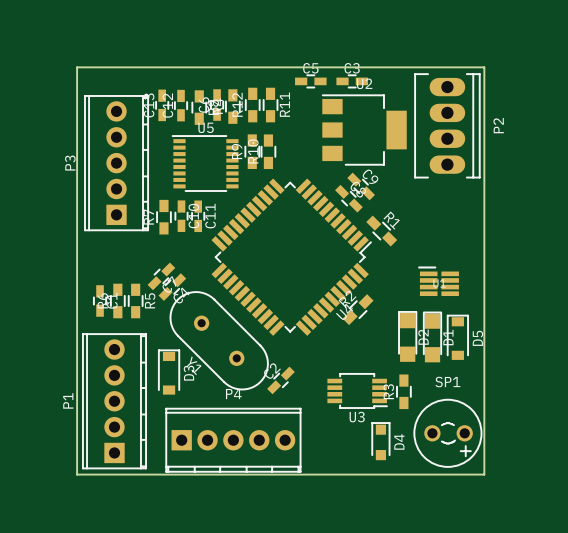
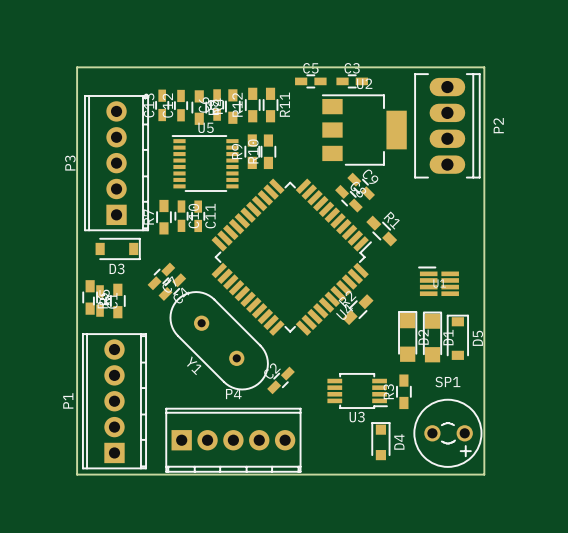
R5 position: (135, 300) -> (90, 297)
D3 rotation: 0° (169, 372) -> 90° clockwise (118, 248)
D3 position: (169, 372) -> (118, 248)

